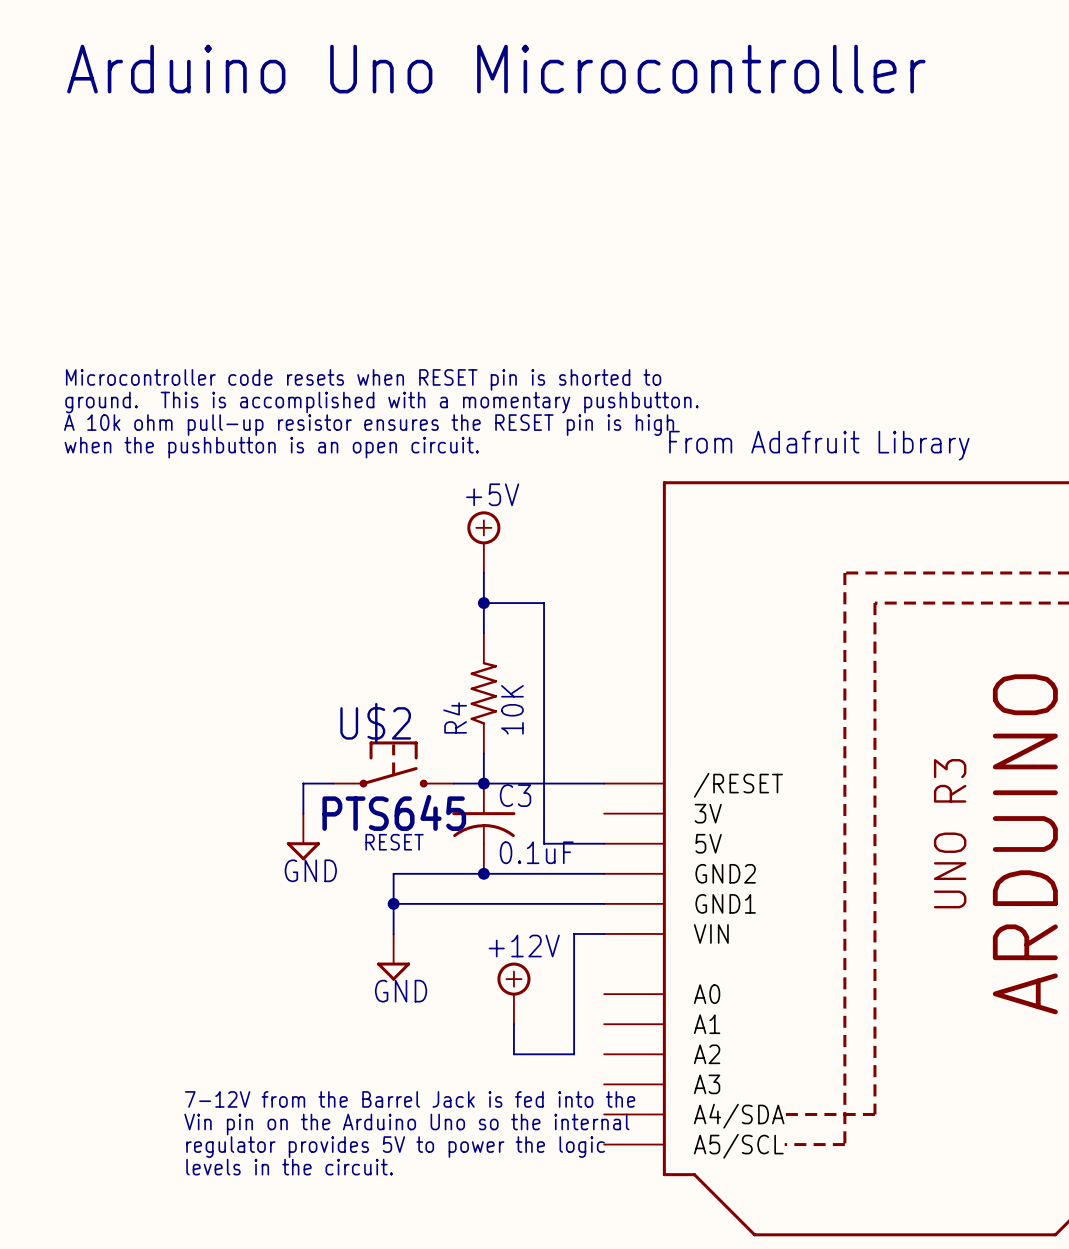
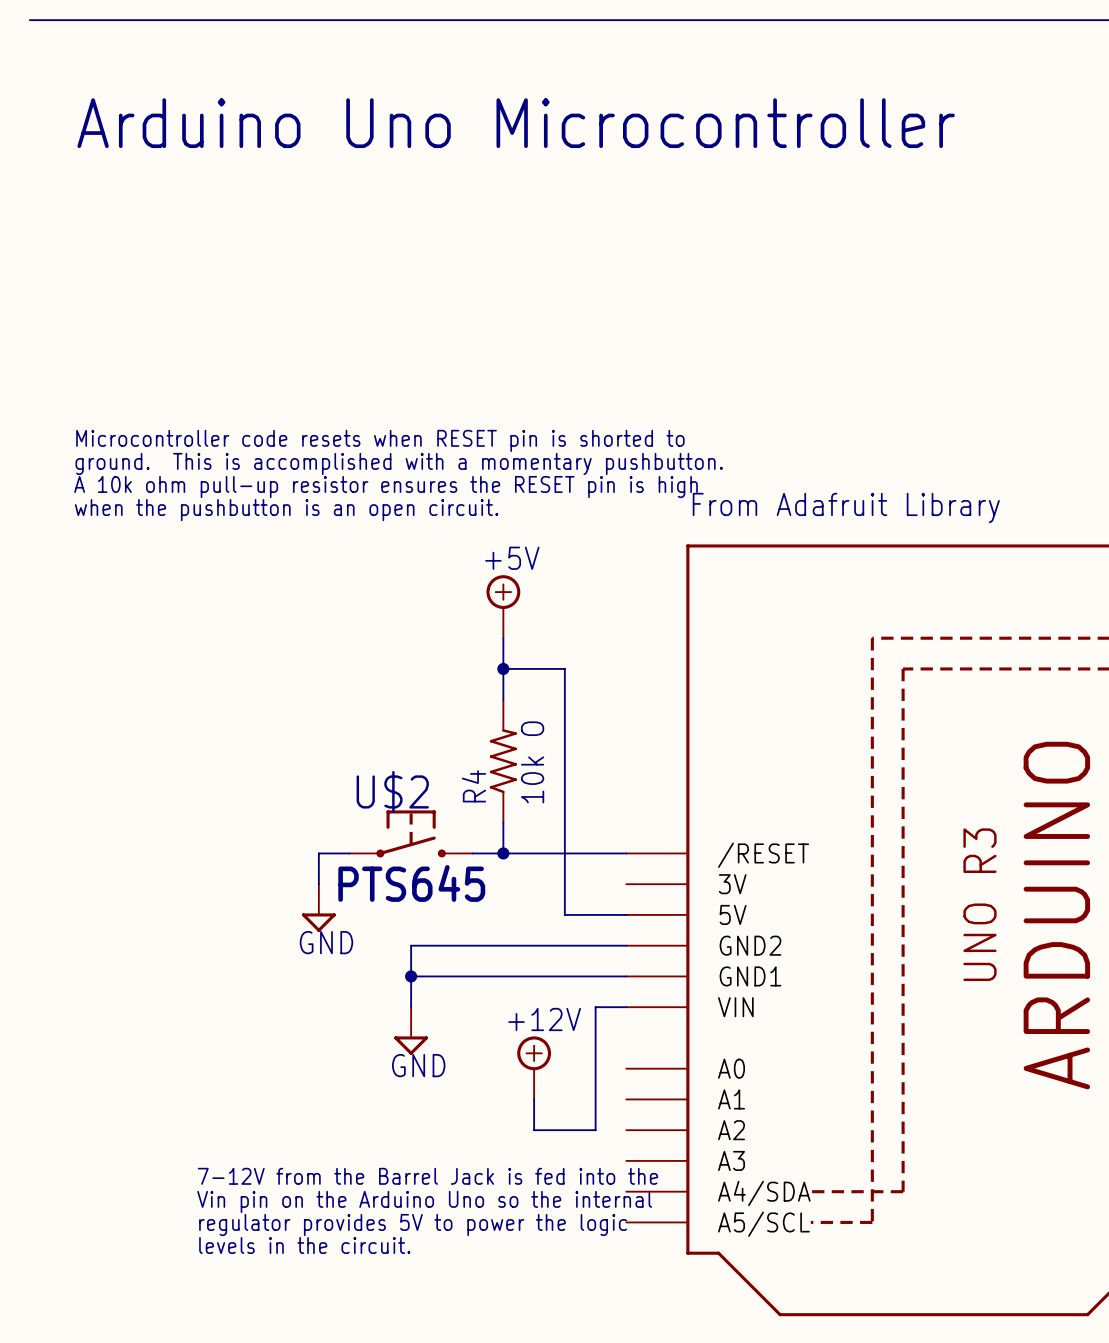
R4 value: 10K (512, 709) -> 10k O (532, 762)
C3: 0.1uF (483, 828) -> none
U$2 text: RESET (394, 842) -> none
junction: (483, 873) -> none

